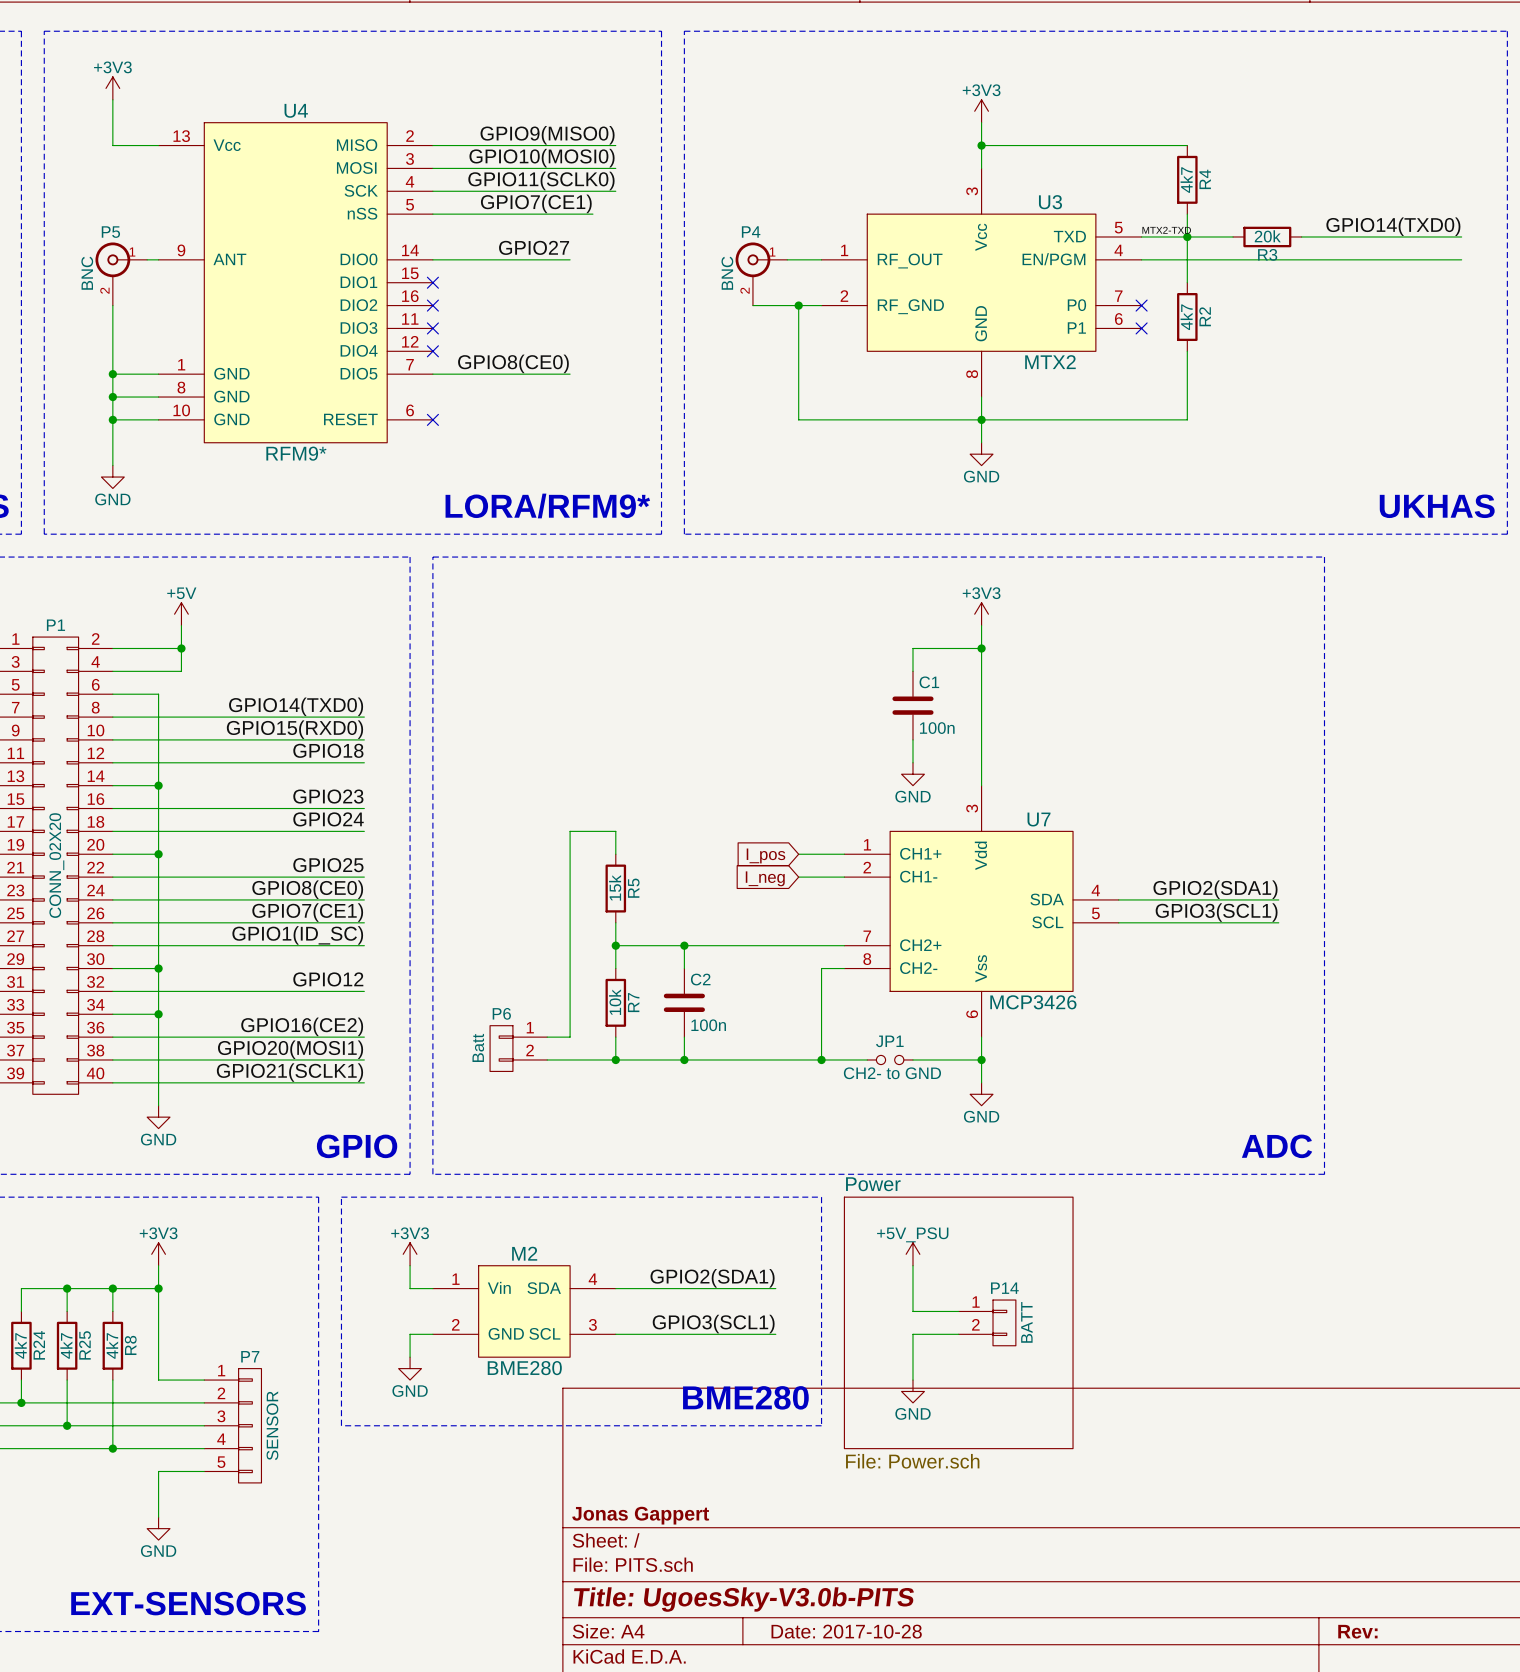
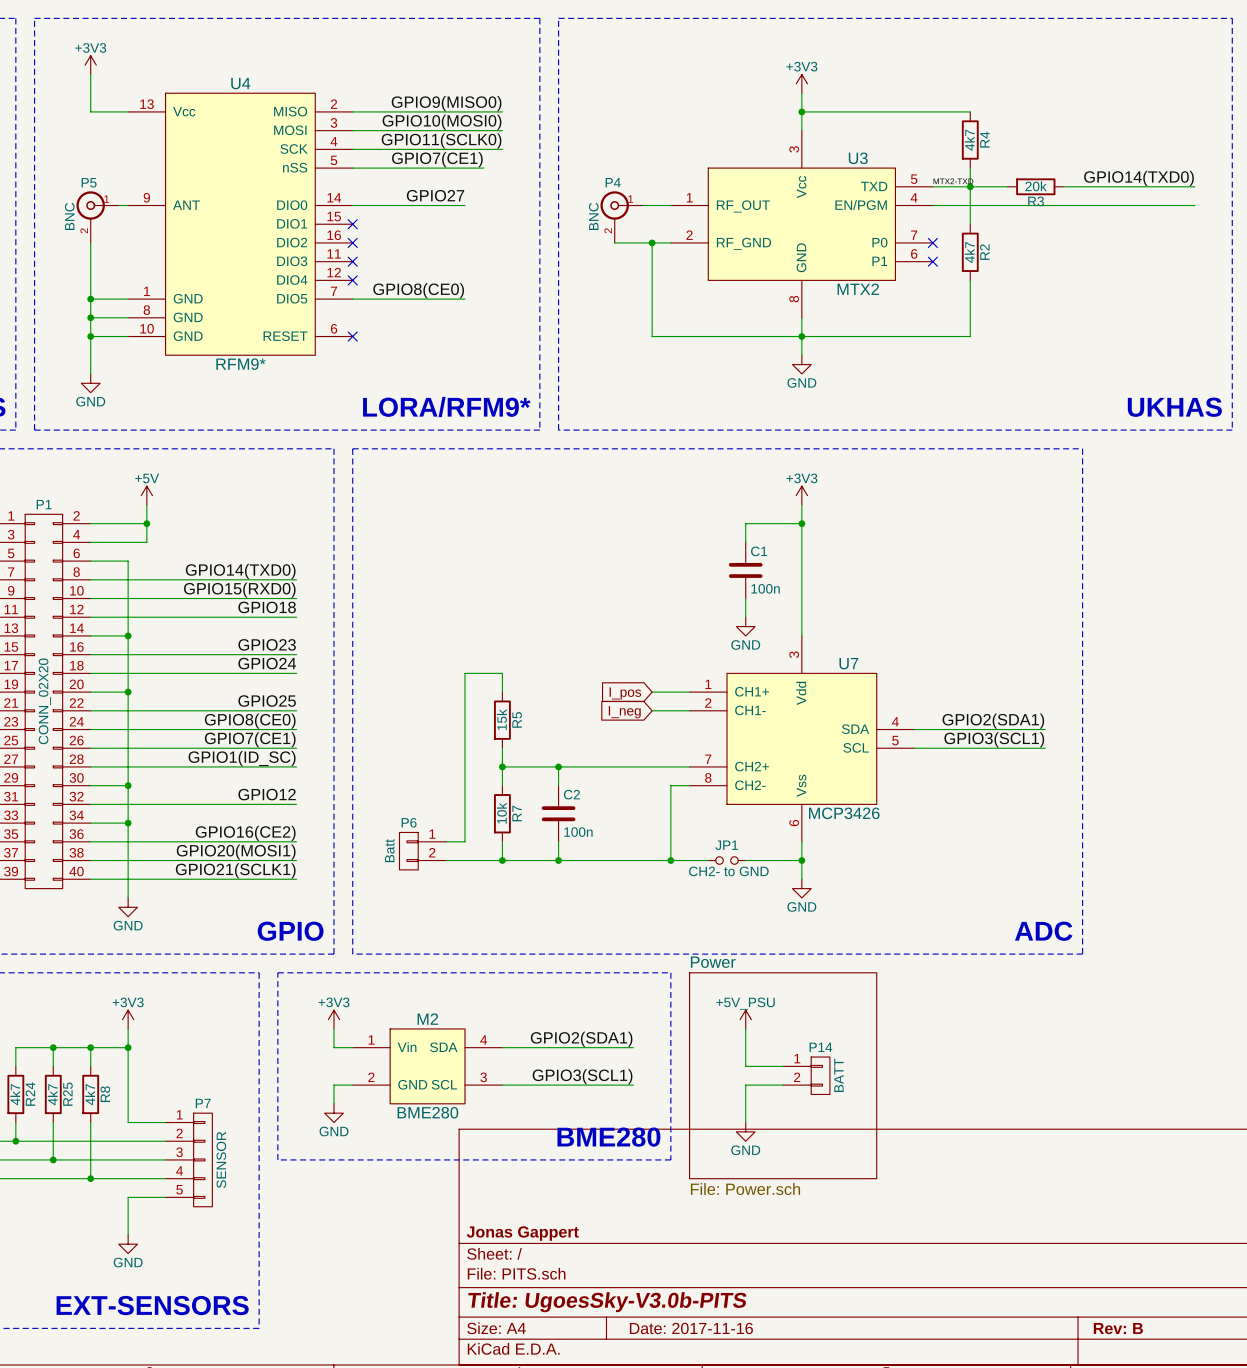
title block: Date: 2017-10-28 (846, 1631) -> Date: 2017-11-16 (691, 1328)
title block: Rev: (1357, 1631) -> Rev: B (1118, 1328)

